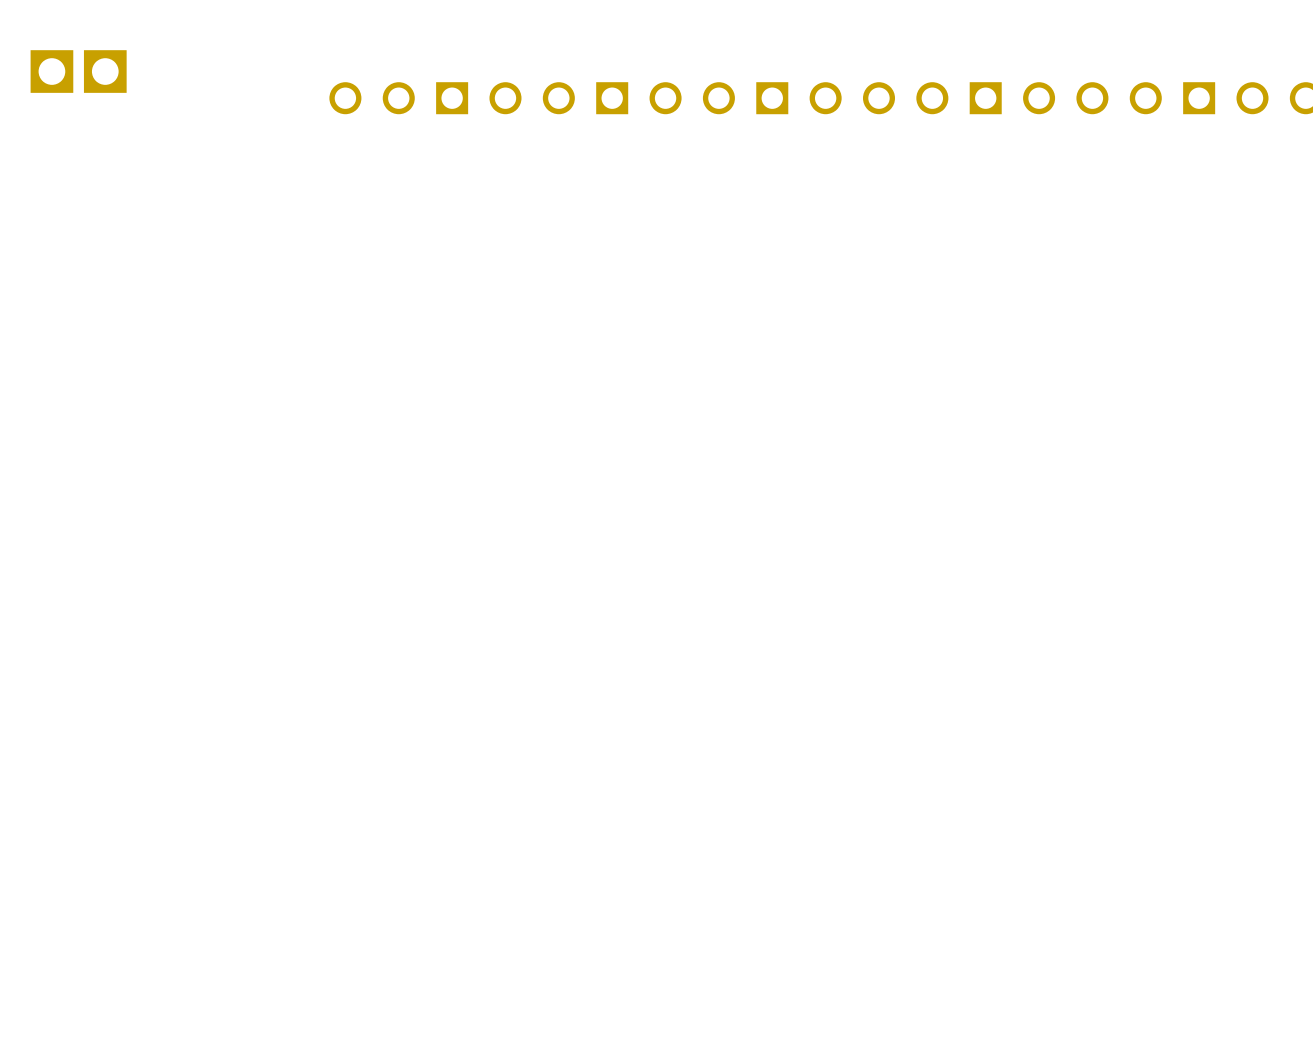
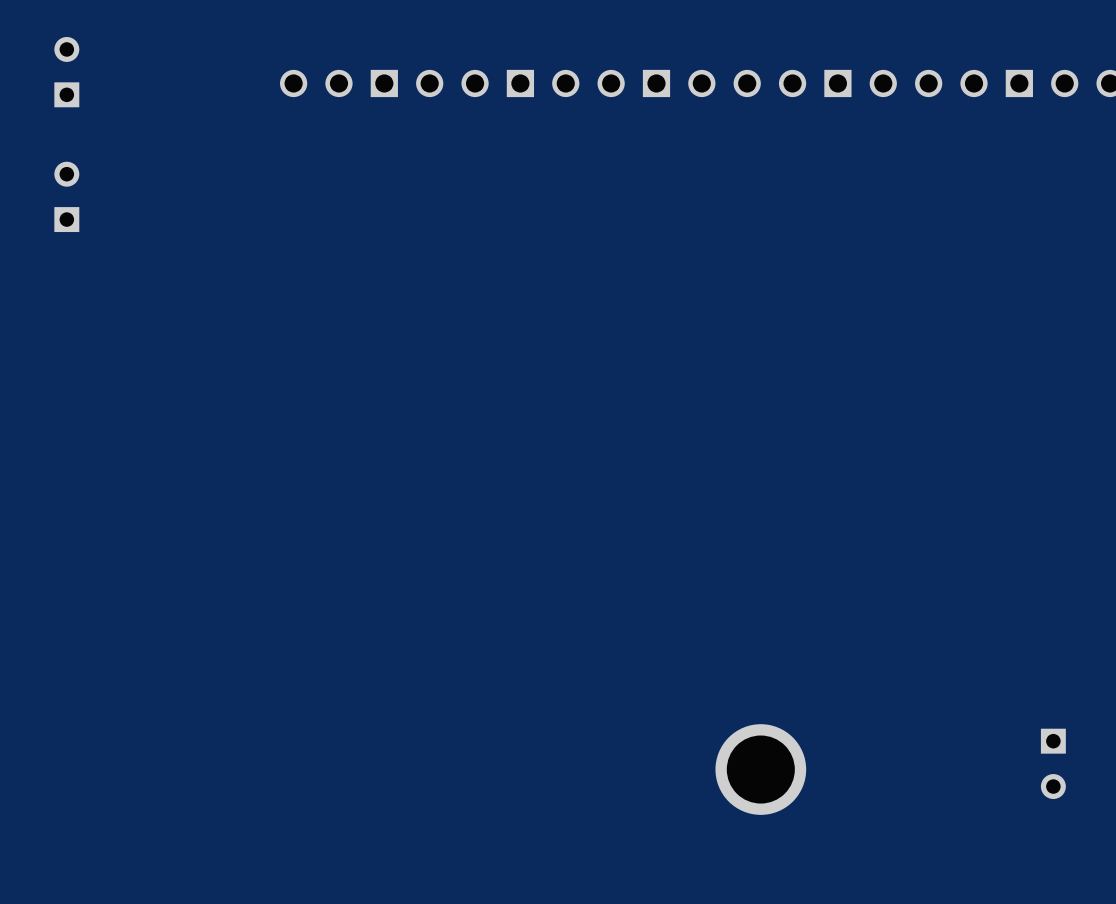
part footprint: [30, 50, 127, 93] -> [54, 36, 80, 108]
part: none -> (66, 196)
part: none -> (1053, 763)
part: none -> (760, 769)

